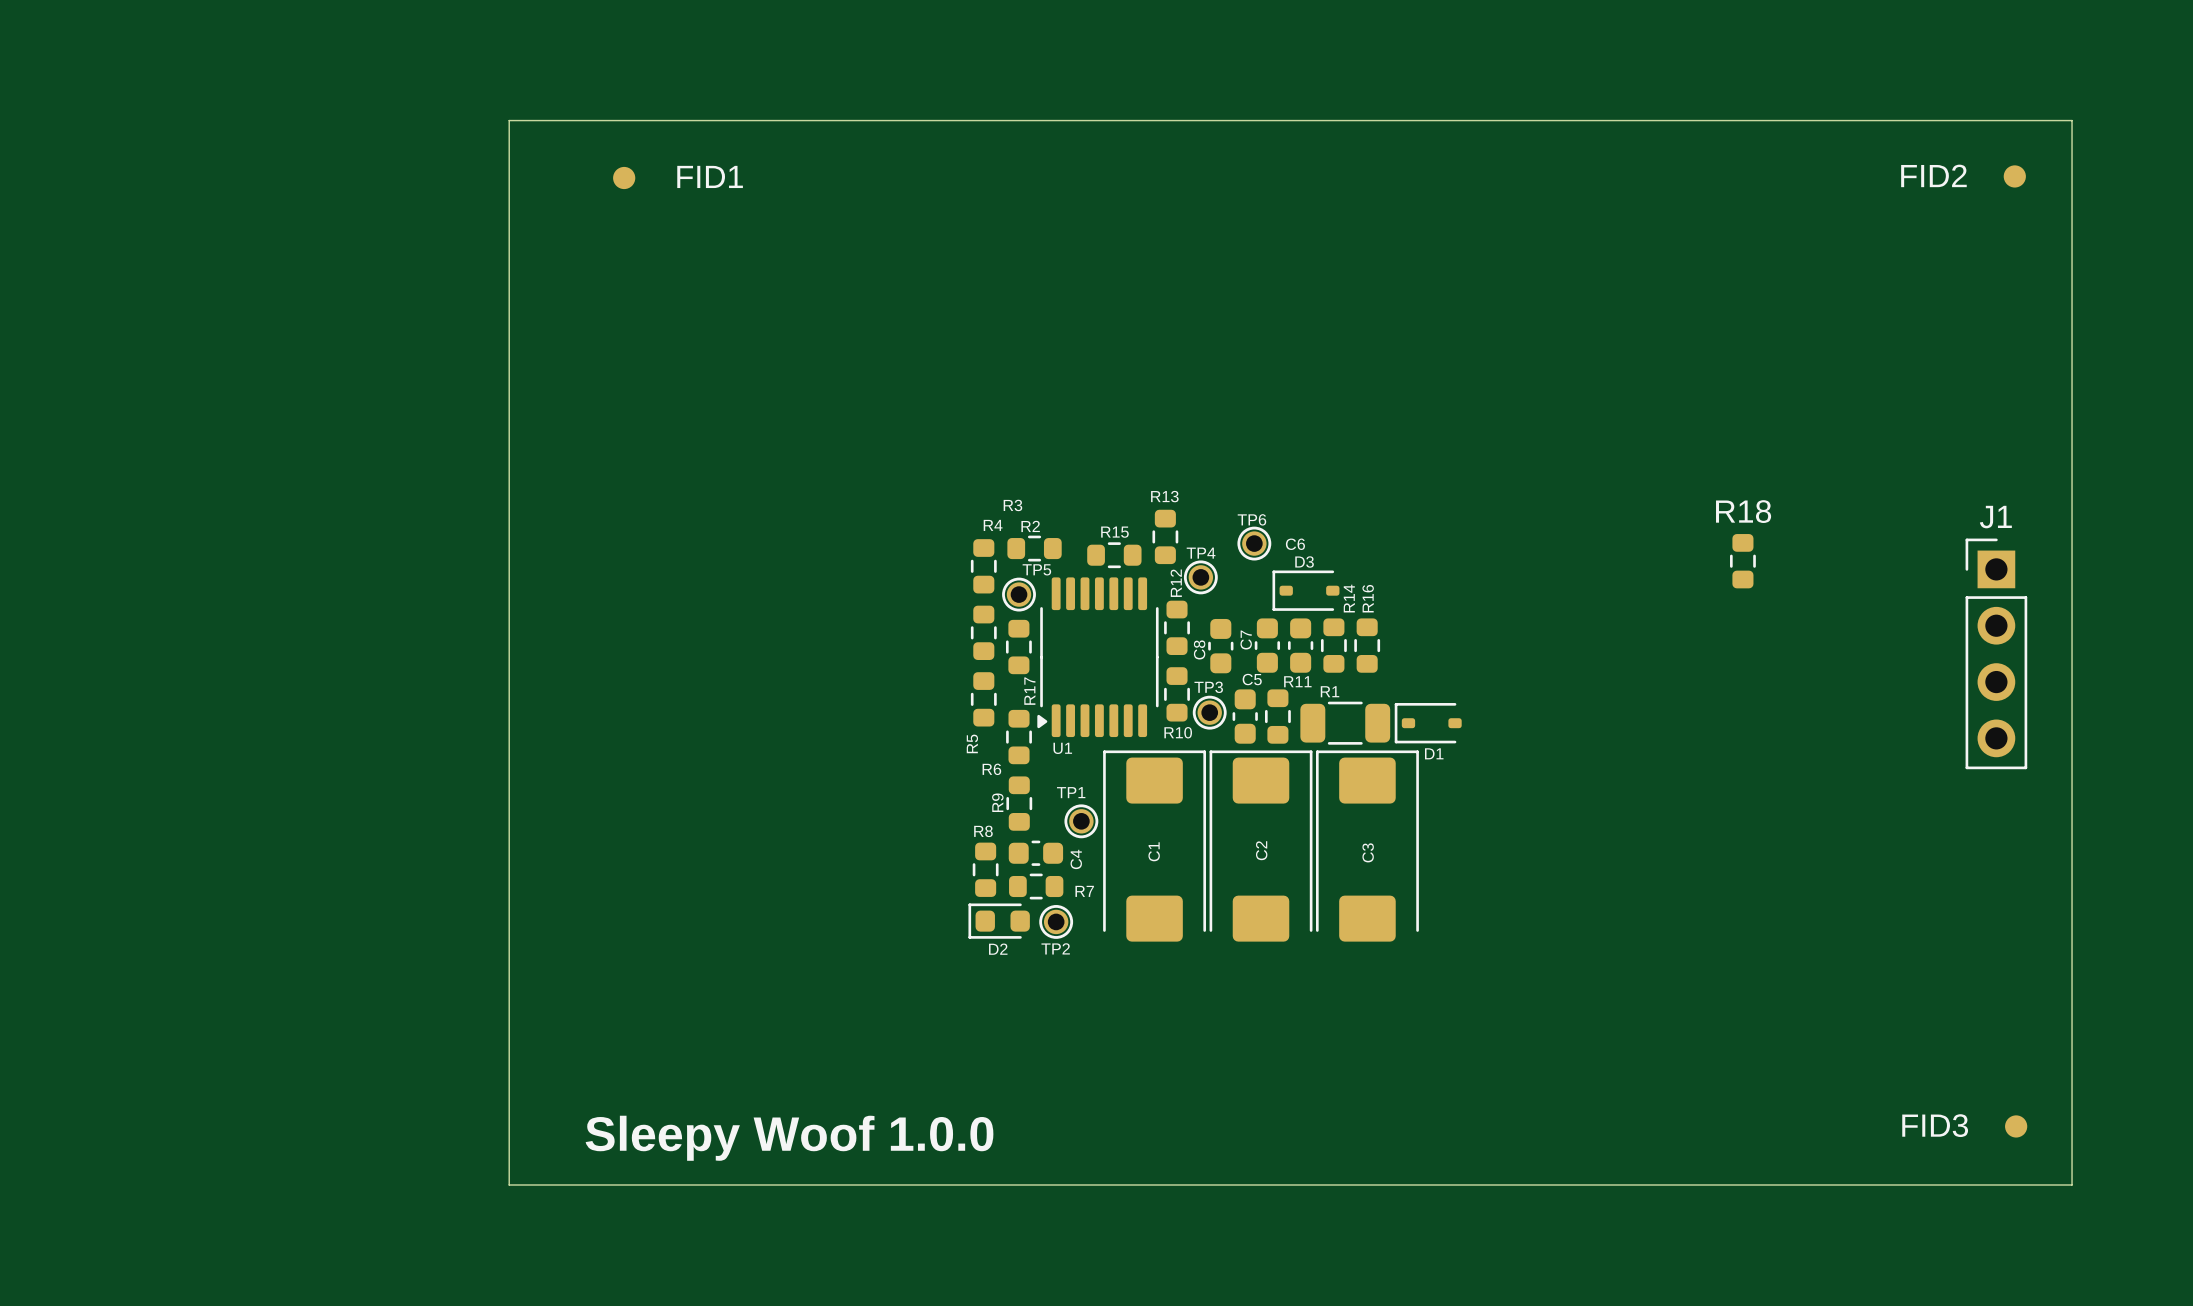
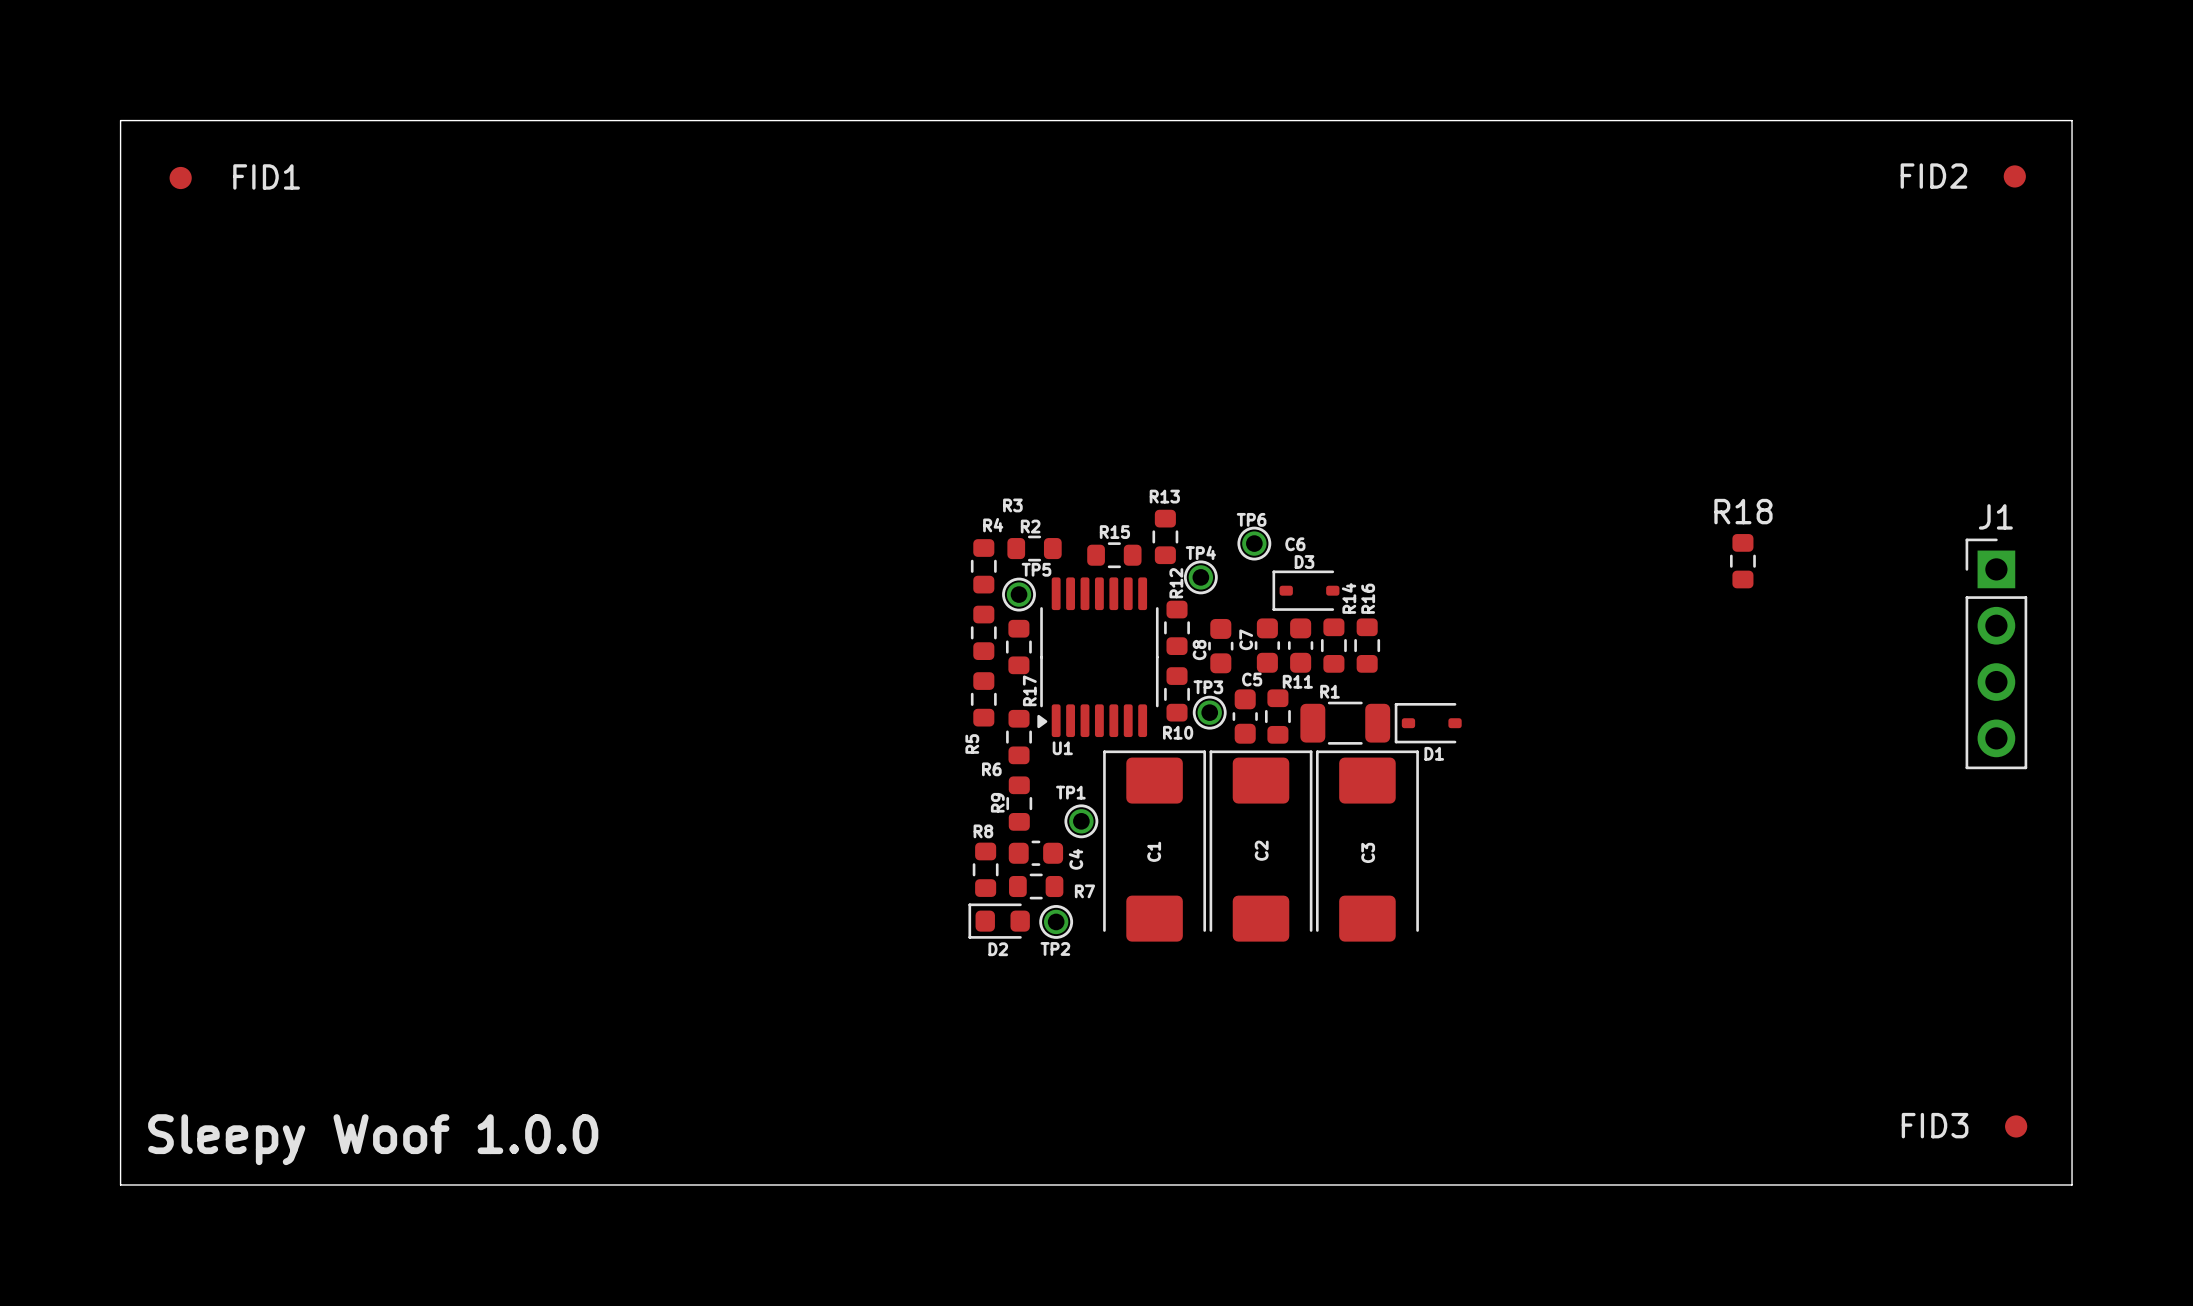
board edge: (509, 120) (509, 1185) -> (509, 120) (120, 120) (120, 1185) (509, 1185)
FID1 position: (624, 178) -> (180, 178)
text position: Sleepy Woof 1.0.0 (789, 1138) -> Sleepy Woof 1.0.0 (373, 1139)

